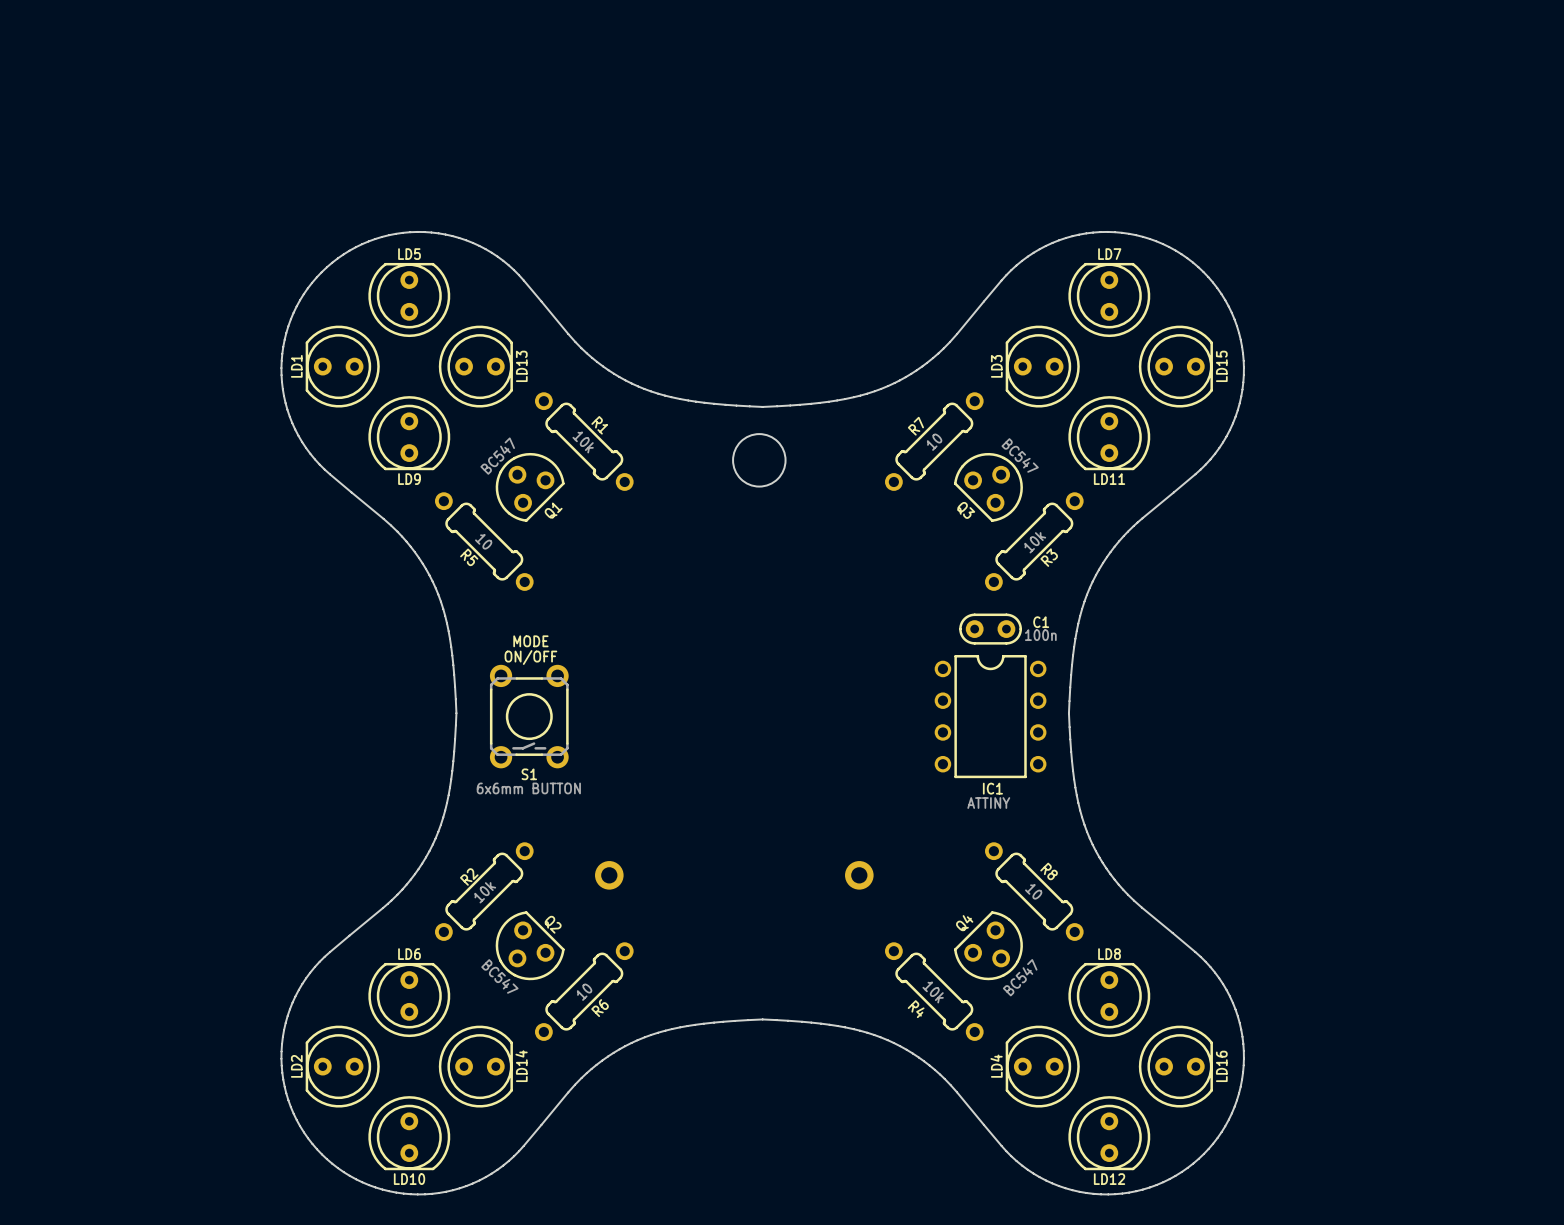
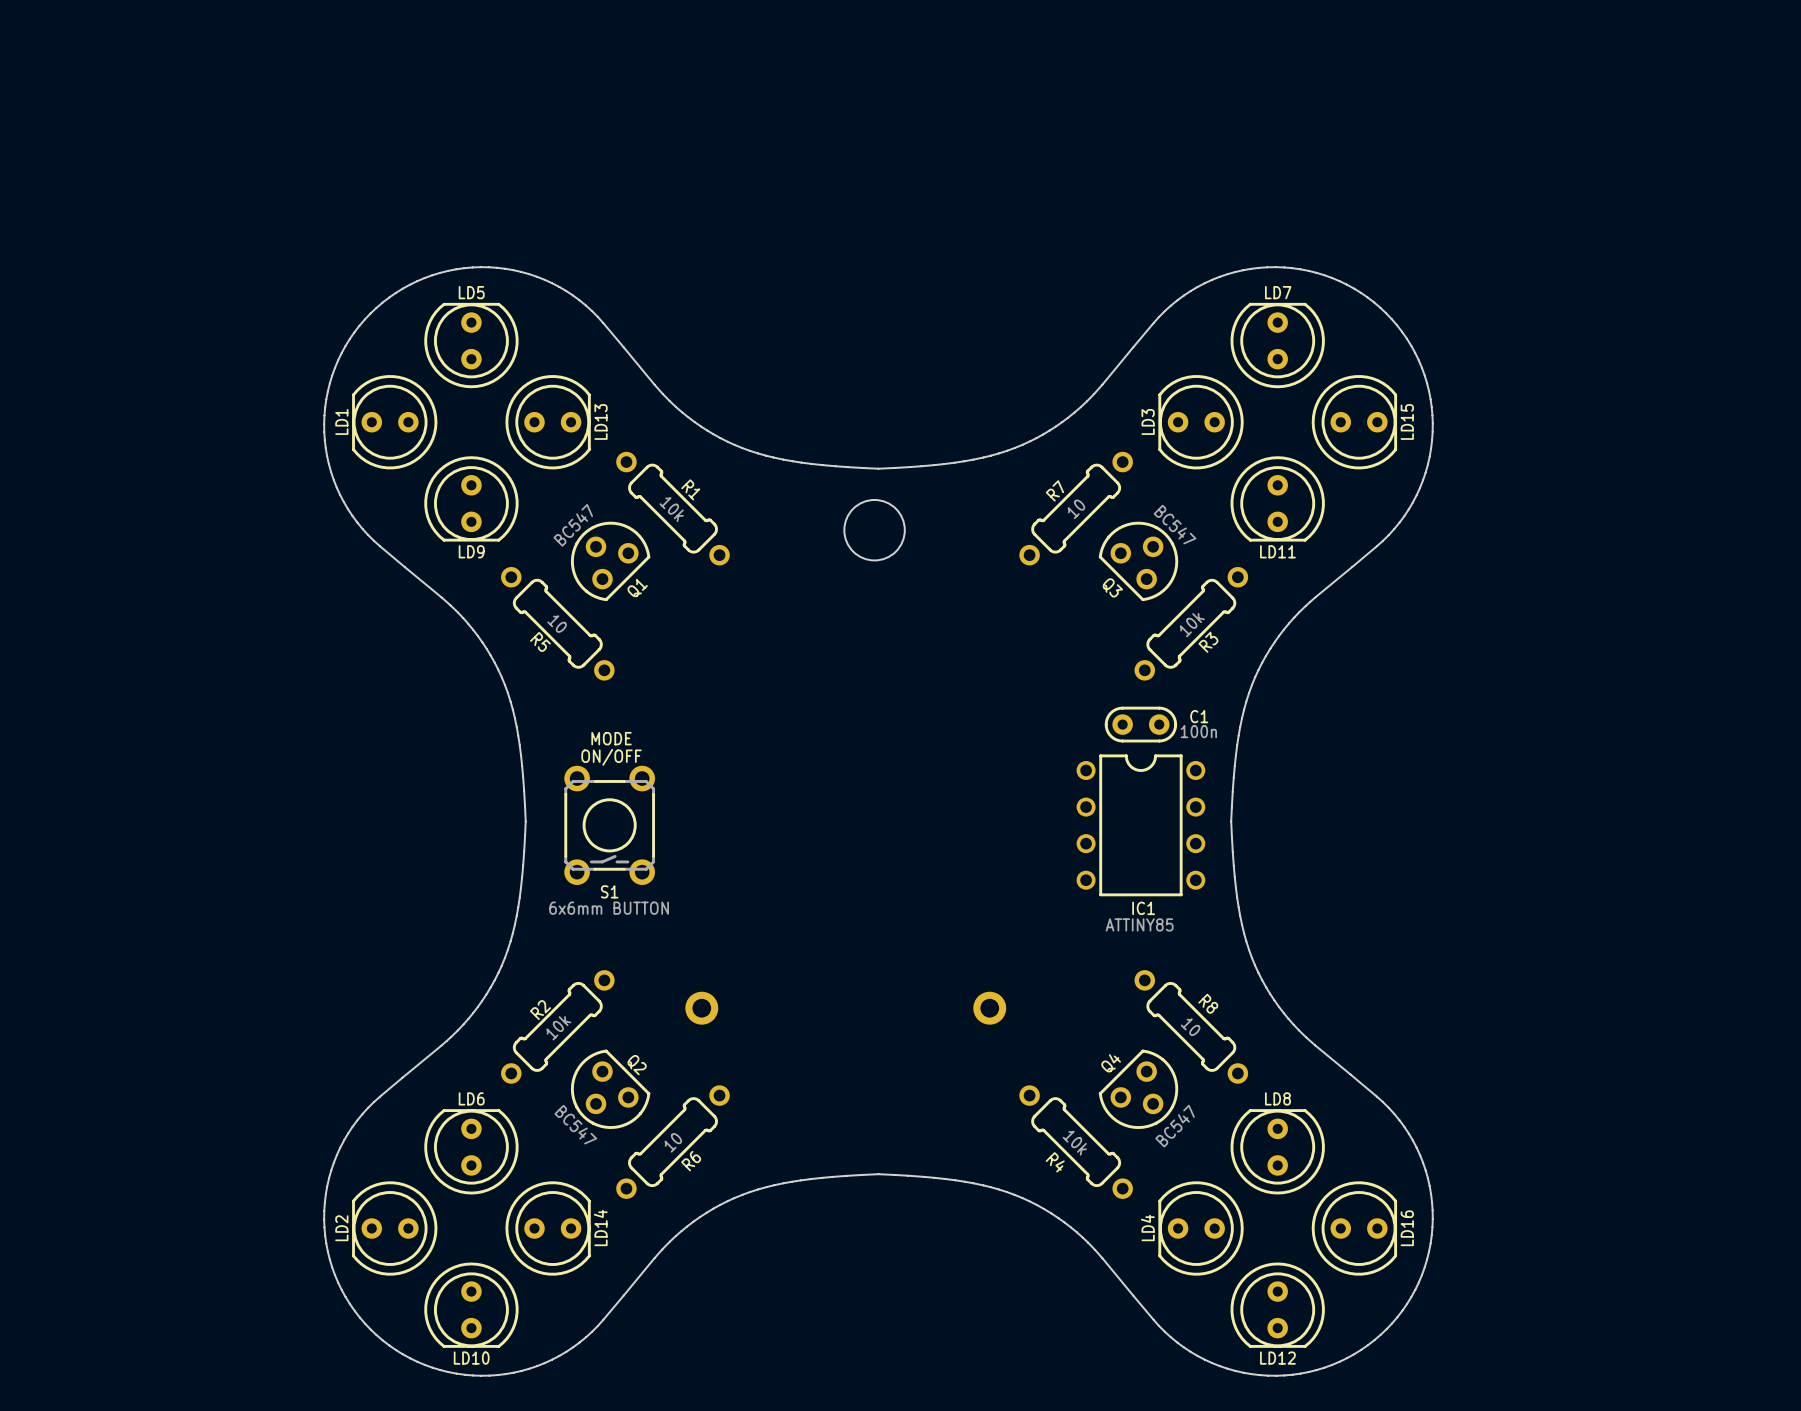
IC1 value: ATTINY (988, 803) -> ATTINY85 (1139, 924)

